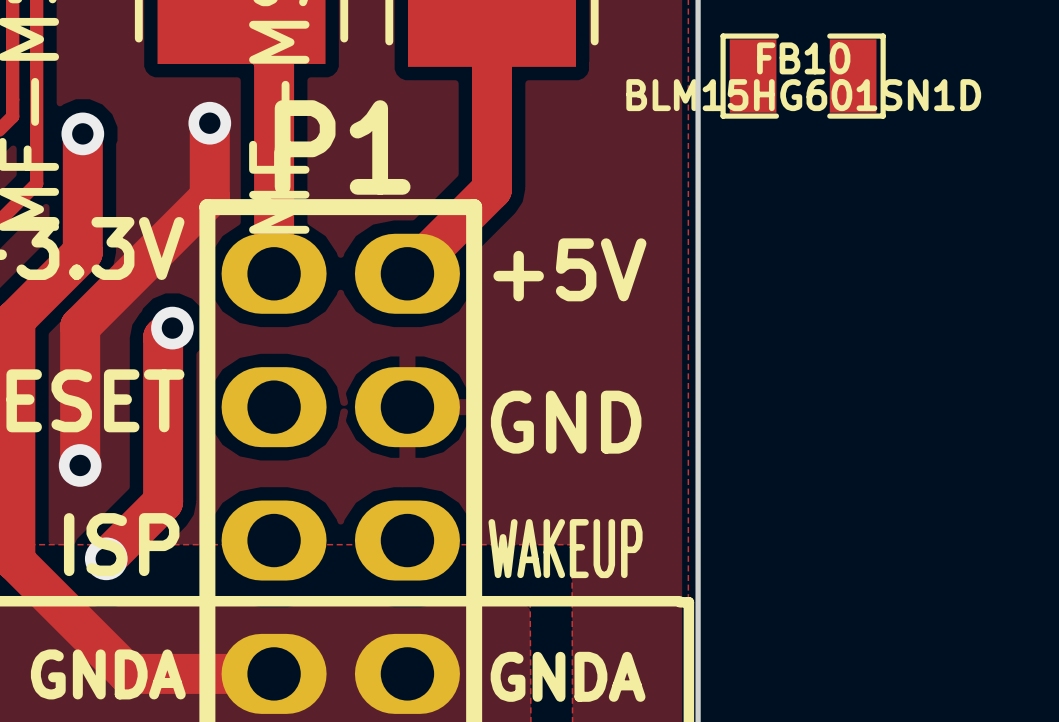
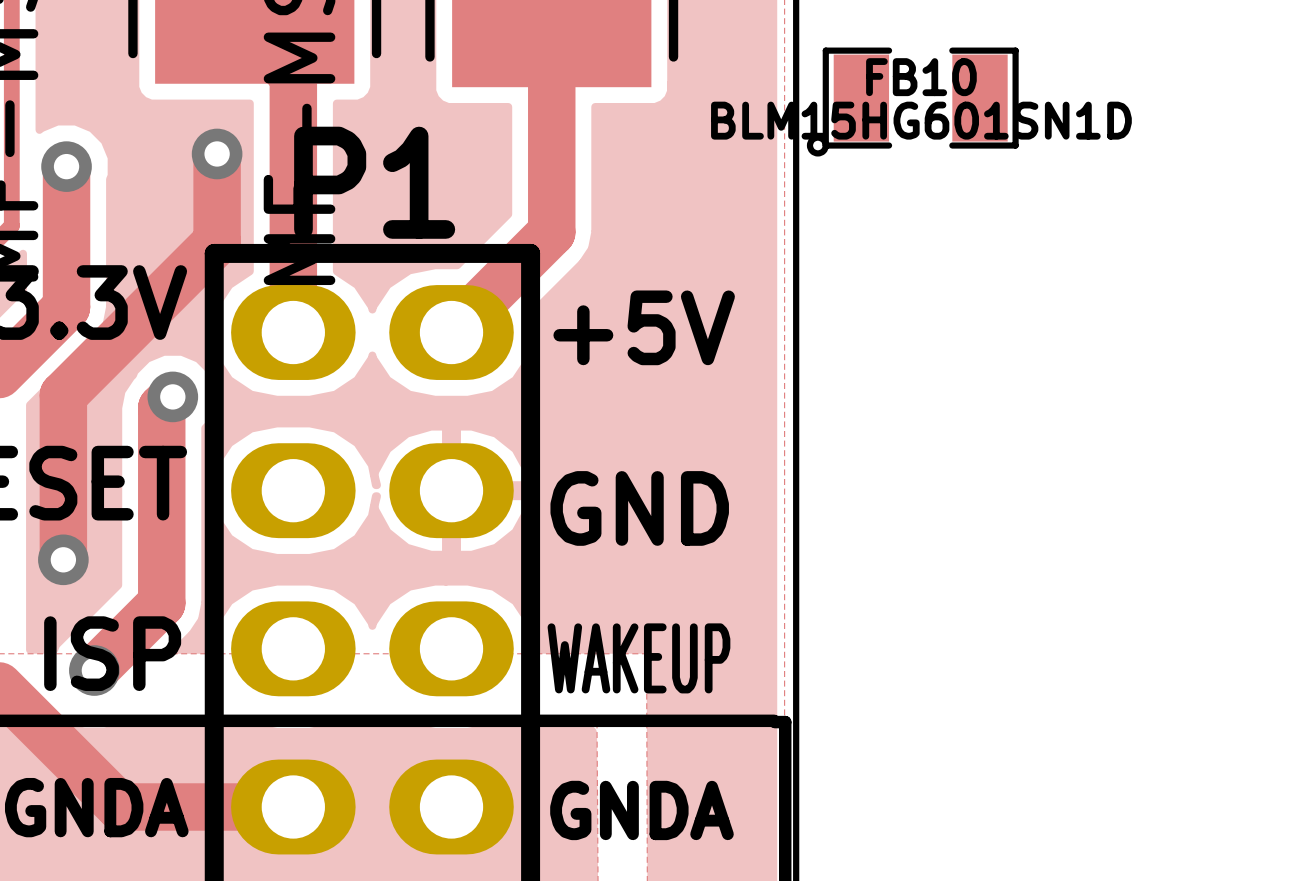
FB10 footprint: [720, 33, 886, 119] -> [806, 47, 1019, 157]

